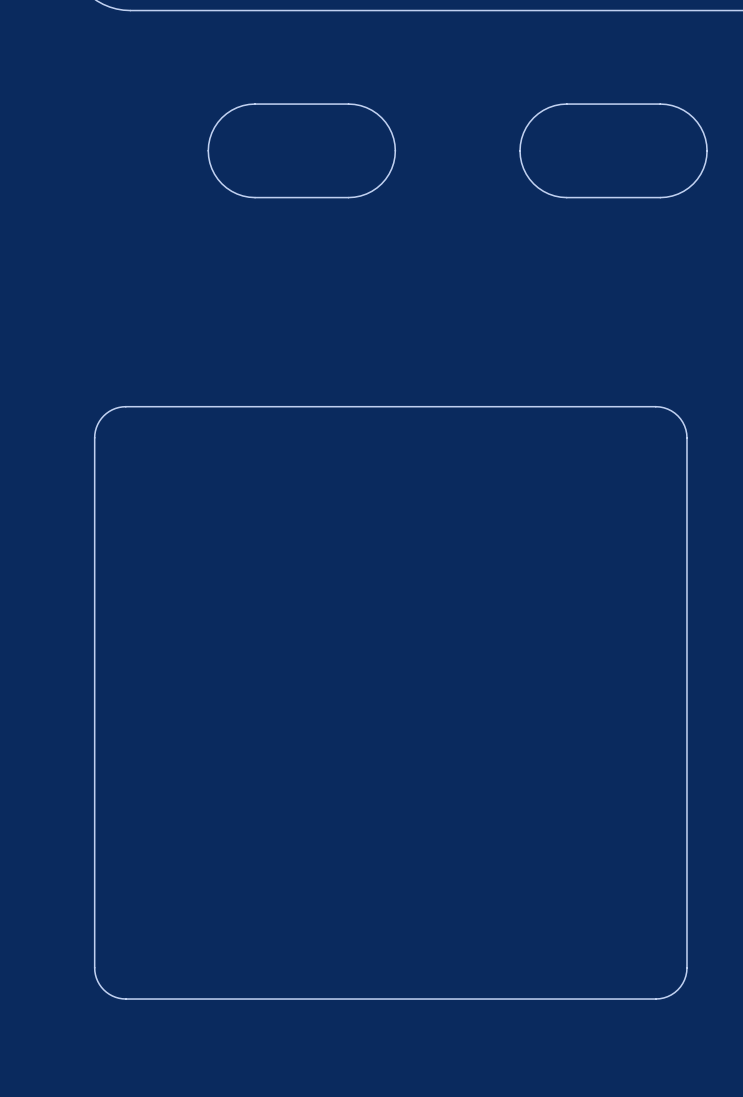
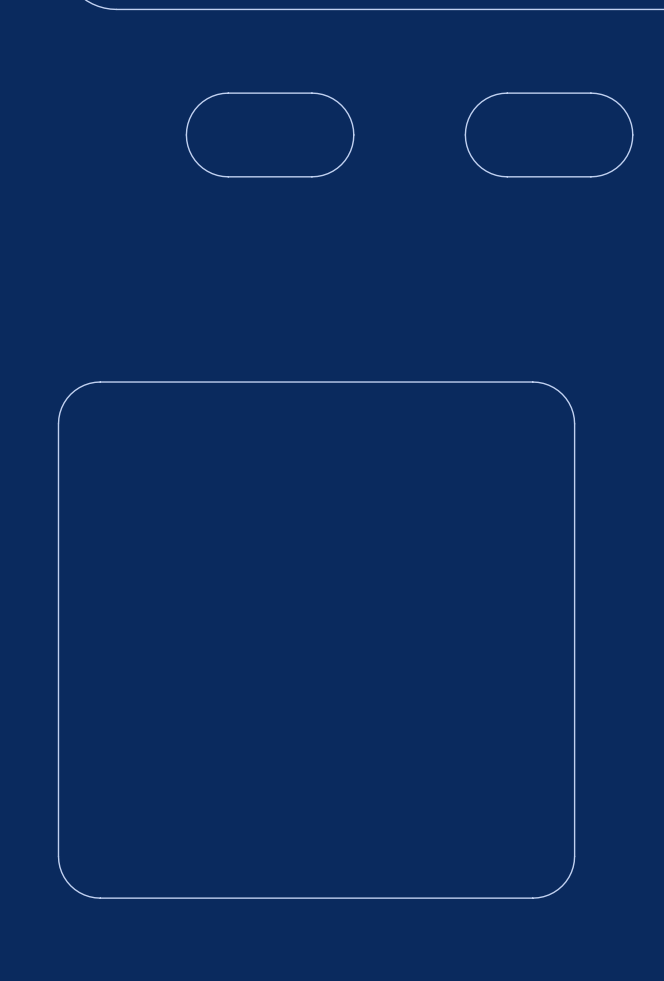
board edge: (125, 406) (655, 406) (667, 409) (677, 415) (684, 425) (686, 437) (686, 967) (684, 979) (677, 989) (667, 996) (655, 999) (125, 999) (115, 997) (103, 989) (96, 978) (94, 967) (94, 437) (97, 424) (103, 415) (112, 409) (125, 406) -> (100, 382) (84, 385) (70, 394) (61, 407) (58, 423) (58, 856) (61, 872) (70, 885) (84, 894) (100, 898) (532, 898) (548, 894) (562, 885) (571, 872) (574, 856) (574, 423) (571, 407) (562, 394) (548, 385) (532, 382) (100, 382)

